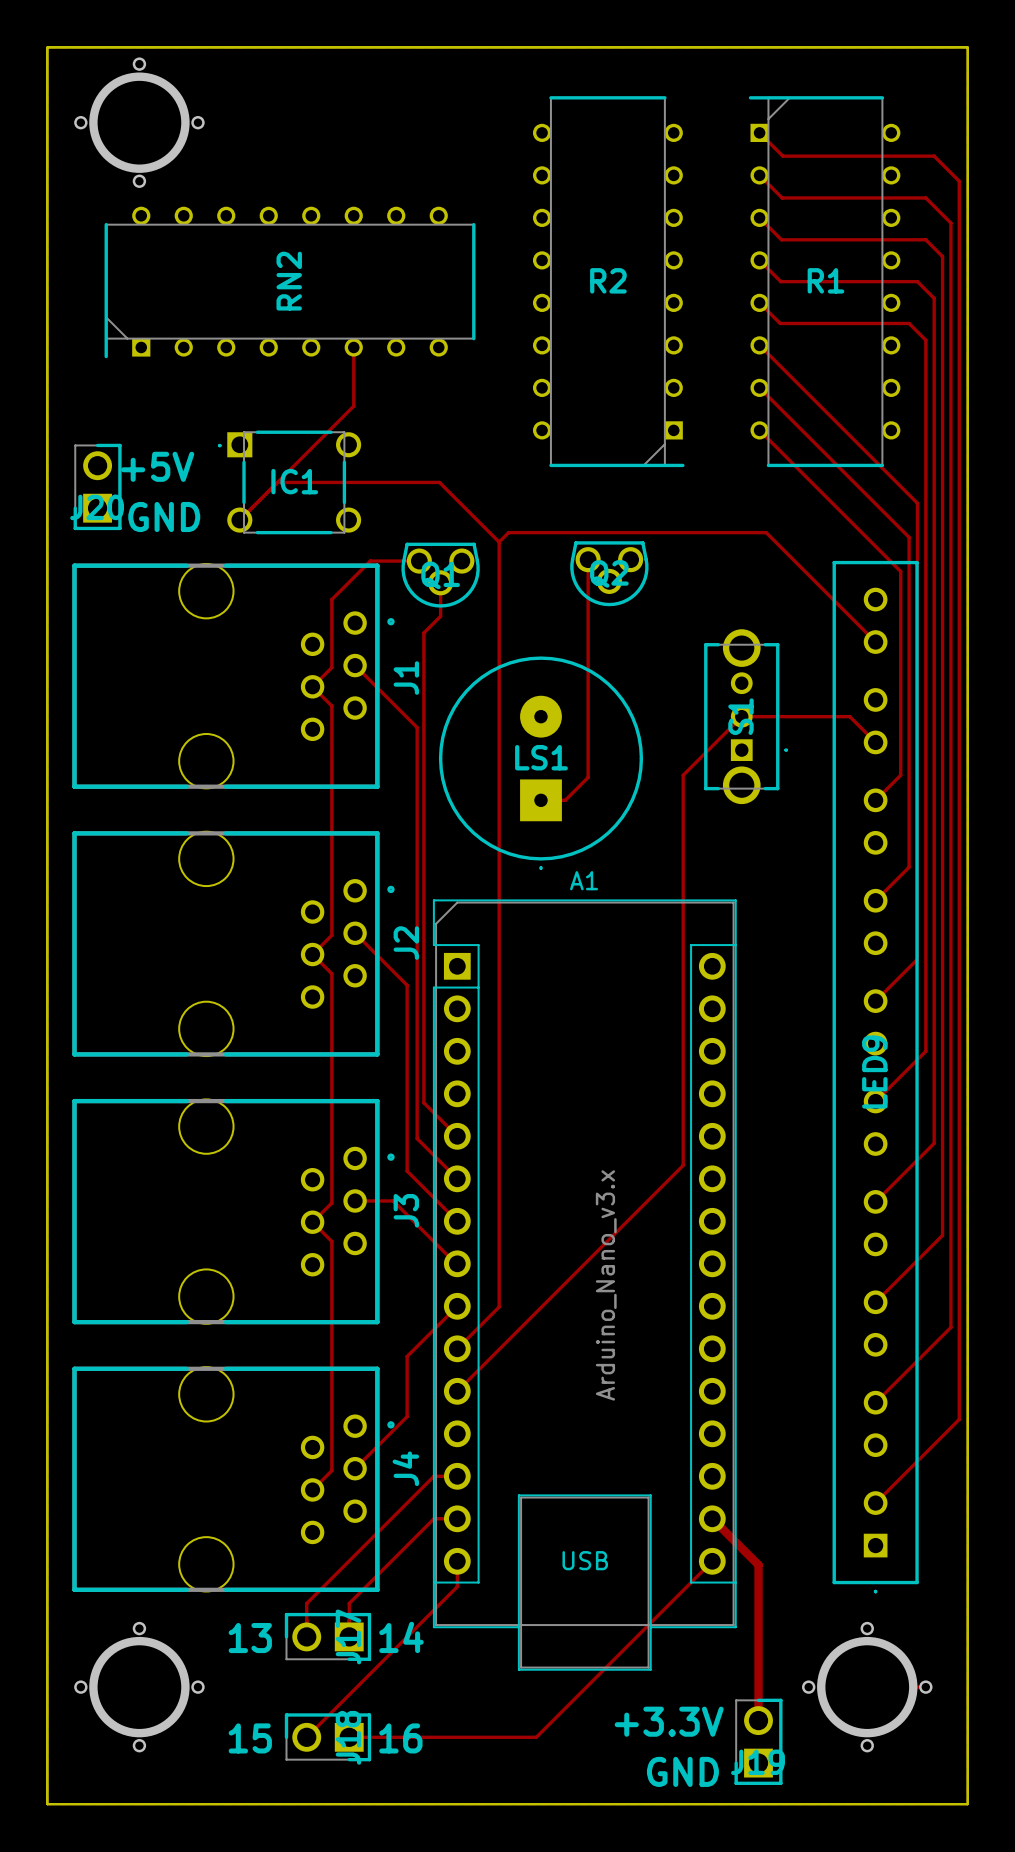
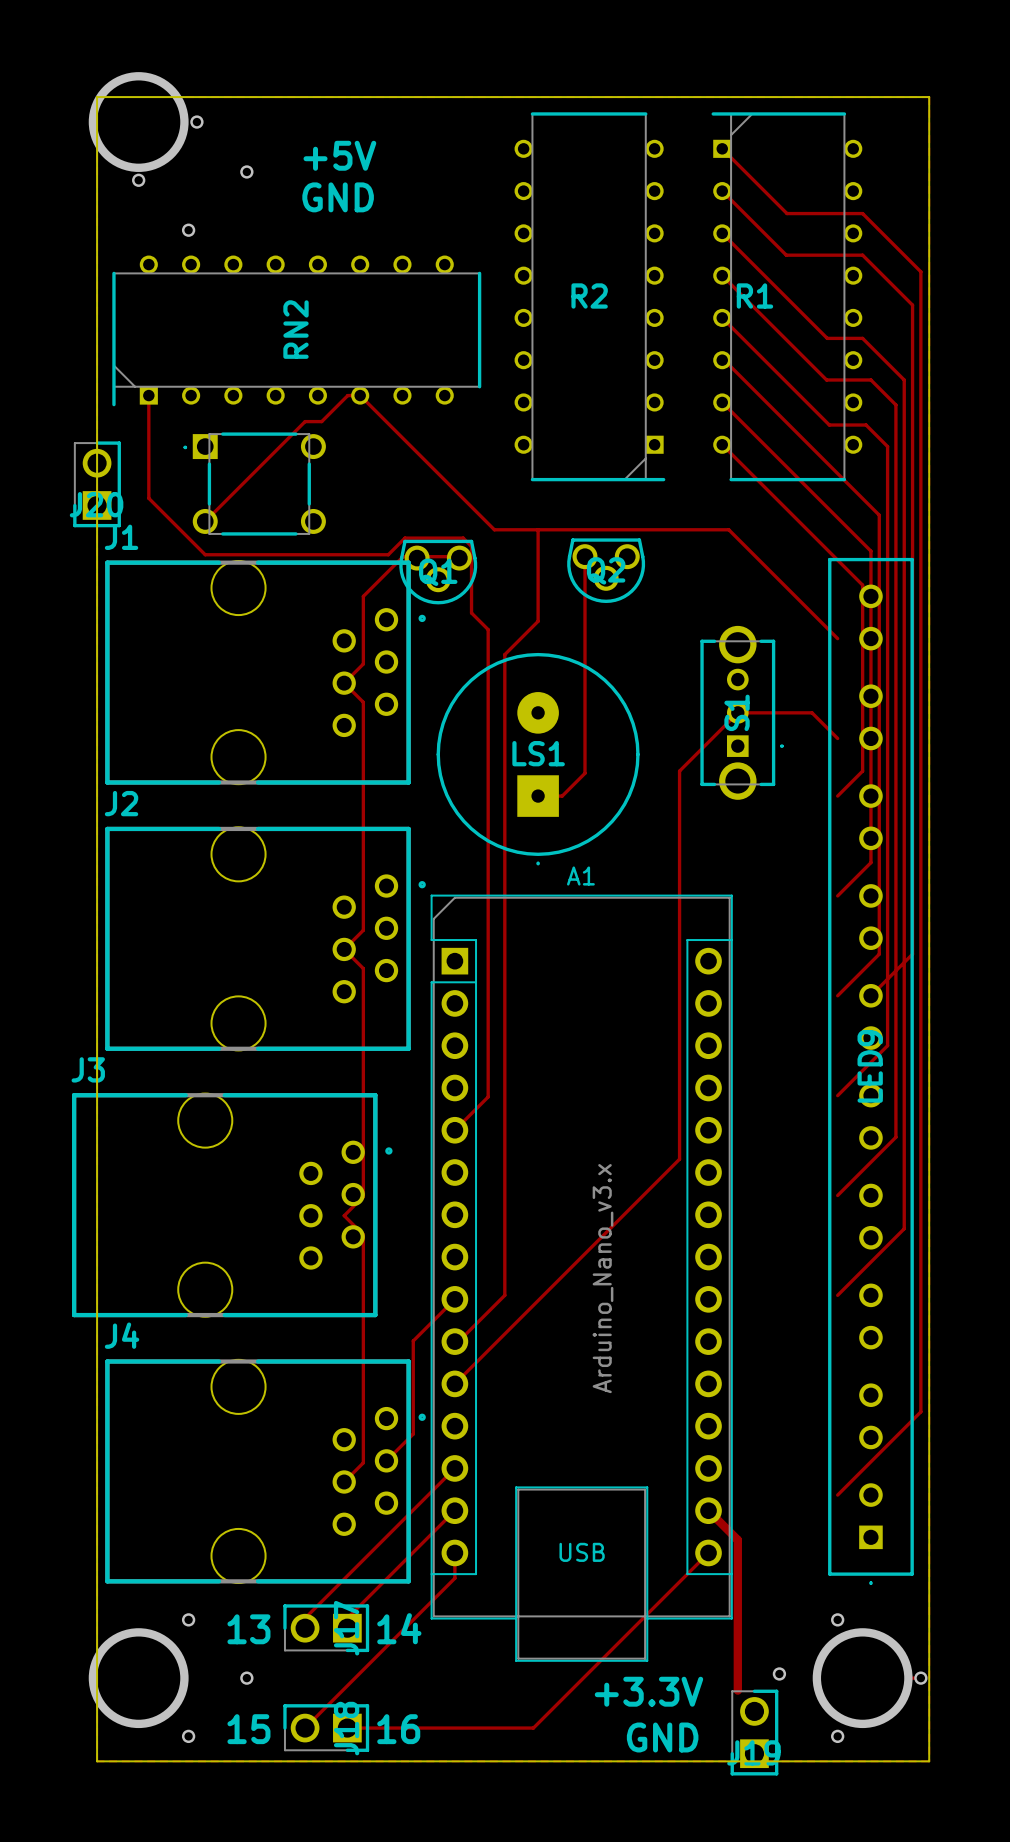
board edge: (47, 47) (967, 47) (967, 1804) (47, 1804) (47, 47) -> (97, 97) (97, 1761) (929, 1761) (929, 97) (97, 97)
via: (139, 64) -> none
via: (80, 122) -> none
track: (759, 132) (782, 156) (934, 156) (959, 181) (959, 1419) (875, 1503) -> none
via: none -> (246, 171)
track: (759, 175) (782, 197) (925, 197) (950, 223) (950, 1327) (875, 1402) -> none
track: (759, 217) (781, 239) (925, 239) (942, 256) (942, 1235) (875, 1302) -> none
via: none -> (188, 230)
track: (759, 260) (780, 281) (917, 281) (934, 298) (934, 1143) (875, 1201) -> none
R1 name position: R1 (825, 280) -> R1 (754, 295)
R2 position: (608, 281) -> (589, 296)
R1 position: (824, 281) -> (786, 296)
RN2 position: (290, 282) -> (296, 330)
track: (759, 302) (780, 323) (909, 323) (925, 340) -> (722, 148) (786, 213) (862, 213) (920, 271) (920, 338)
track: none -> (722, 317) (829, 425) (866, 425) (887, 446) (887, 1045) (837, 1095)
track: (759, 345) (917, 503) -> (722, 191) (786, 255) (862, 255) (912, 305) (912, 500)
track: (353, 347) (353, 406) (239, 520) -> none
track: none -> (722, 358) (879, 515) (879, 954) (837, 995)
track: (759, 387) (909, 537) -> (722, 233) (827, 338) (862, 338) (904, 380) (904, 534)
track: none -> (722, 402) (870, 551) (870, 862) (837, 895)
track: (759, 430) (900, 571) -> (722, 275) (826, 380) (870, 380) (895, 404) (895, 568)
track: none -> (722, 444) (862, 585) (862, 771) (837, 796)
text position: +5V (157, 466) -> +5V (339, 155)
track: (277, 482) (439, 482) (499, 542) -> none
IC1: (289, 482) -> none
part: none -> (254, 484)
text position: GND (164, 517) -> GND (338, 197)
track: (508, 532) (499, 542) -> (505, 529) (494, 529) (360, 395) (347, 395) (321, 421) (305, 421) (205, 521)
track: none -> (538, 529) (538, 621) (504, 654) (504, 1295) (458, 1341)
track: (732, 532) (766, 532) (875, 642) -> (728, 529) (837, 638)
track: (499, 542) (499, 1306) (457, 1348) -> none
track: none -> (450, 556) (403, 556) (363, 596) (363, 664) (344, 683) (363, 702) (363, 930) (344, 949) (363, 968) (363, 1196) (344, 1215) (363, 1234) (363, 1462) (344, 1482)
track: (419, 561) (370, 561) (331, 599) (331, 667) (312, 686) (331, 706) (331, 935) (312, 954) (331, 973) (331, 1202) (312, 1222) (331, 1241) (331, 1470) (312, 1489) -> none
track: (440, 582) (440, 616) (423, 633) (423, 1102) (457, 1136) -> (148, 395) (148, 498) (205, 554) (388, 554) (404, 538) (463, 538) (471, 546) (471, 613) (488, 629) (488, 1096) (454, 1130)
track: (355, 665) (417, 727) (417, 1138) (457, 1178) -> none
J1 position: (233, 676) -> (265, 672)
J1 name rotation: 0° (406, 678) -> 90° clockwise (121, 537)
J1 name position: J1 (406, 678) -> J1 (121, 537)
track: (816, 716) (849, 716) (875, 742) -> (812, 712) (837, 738)
track: (900, 775) (875, 800) -> (895, 771) (895, 1137) (837, 1195)
track: (909, 867) (875, 900) -> (904, 862) (904, 1228) (837, 1295)
track: (355, 933) (407, 985) (407, 1171) (457, 1221) -> none
J2 position: (233, 943) -> (265, 938)
J2 name rotation: 0° (406, 943) -> 90° clockwise (121, 803)
J2 name position: J2 (406, 943) -> J2 (121, 803)
track: (925, 1051) (875, 1101) -> (920, 1045) (920, 1411) (837, 1495)
track: (355, 1200) (393, 1200) (457, 1263) -> none
J3 name rotation: 0° (406, 1210) -> 90° clockwise (88, 1069)
J3 name position: J3 (406, 1210) -> J3 (88, 1069)
track: (415, 1348) (407, 1356) (407, 1416) (355, 1468) -> (413, 1340) (413, 1434) (386, 1460)
J4 name rotation: 0° (405, 1468) -> 90° clockwise (122, 1335)
J4 name position: J4 (405, 1468) -> J4 (122, 1335)
track: (457, 1476) (433, 1476) (306, 1603) (306, 1636) -> (454, 1468) (305, 1618)
J4 position: (233, 1479) -> (265, 1471)
track: (457, 1518) (433, 1518) (349, 1603) (349, 1636) -> (454, 1510) (347, 1618)
track: (741, 1548) (758, 1564) (758, 1720) -> (737, 1540) (737, 1690)
via: (139, 1628) -> none
via: none -> (188, 1619)
via position: (867, 1628) -> (837, 1619)
via: (80, 1687) -> none
via: (197, 1687) -> none
via: none -> (246, 1678)
via position: (808, 1687) -> (779, 1673)
text position: +3.3V (669, 1721) -> +3.3V (648, 1691)
via: (139, 1745) -> none
via: none -> (188, 1736)
via position: (867, 1745) -> (837, 1736)
text position: GND (682, 1771) -> GND (662, 1737)

